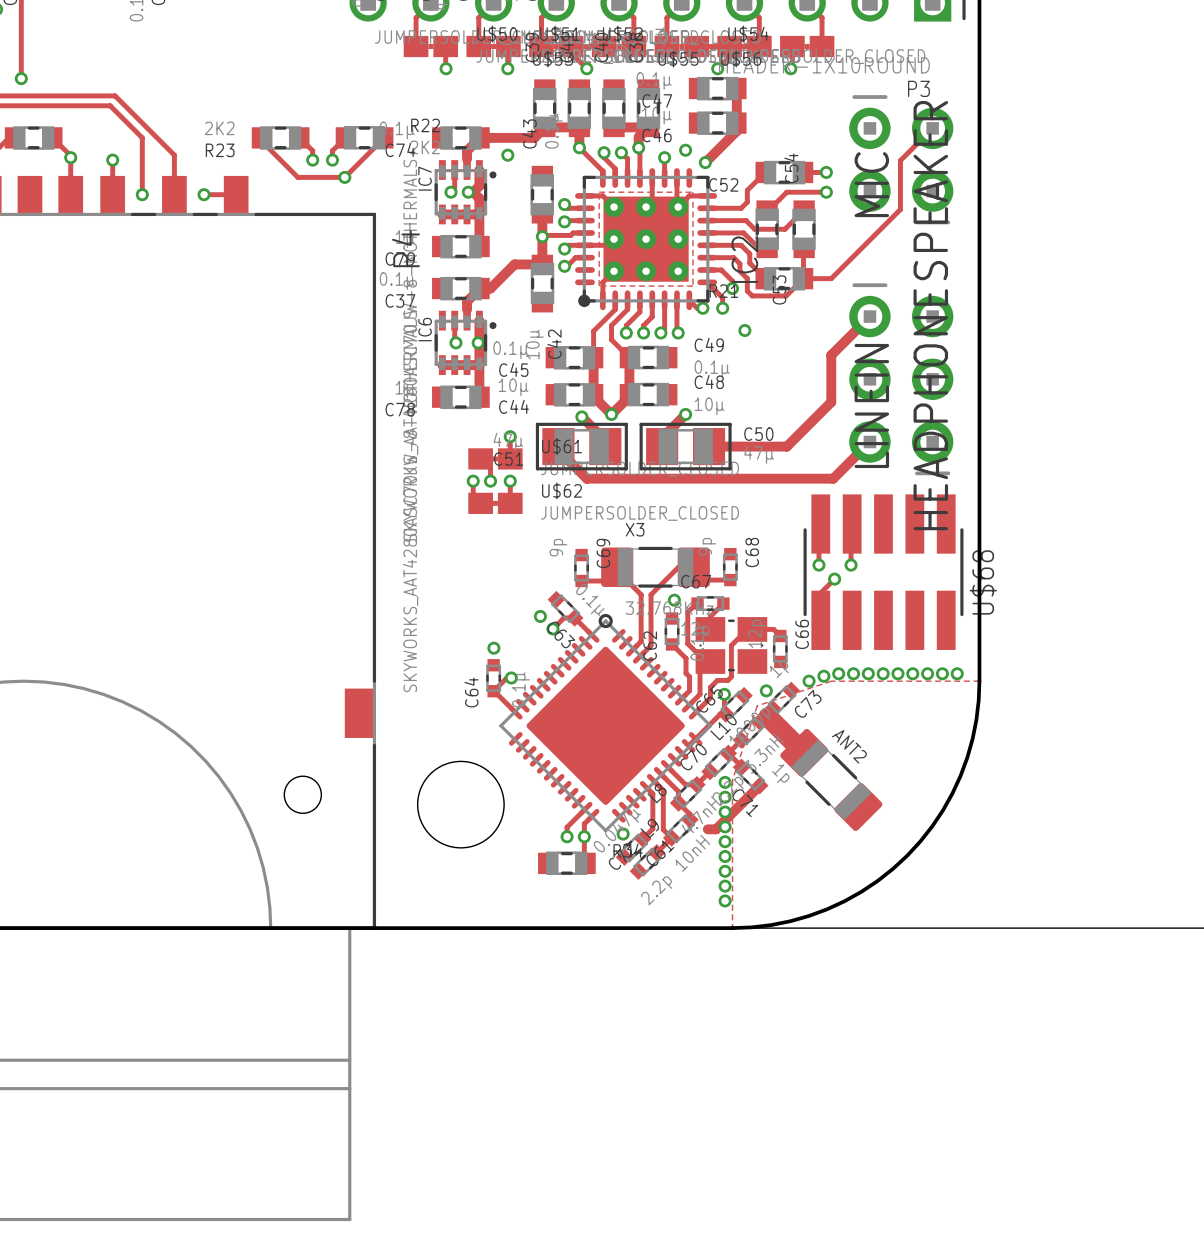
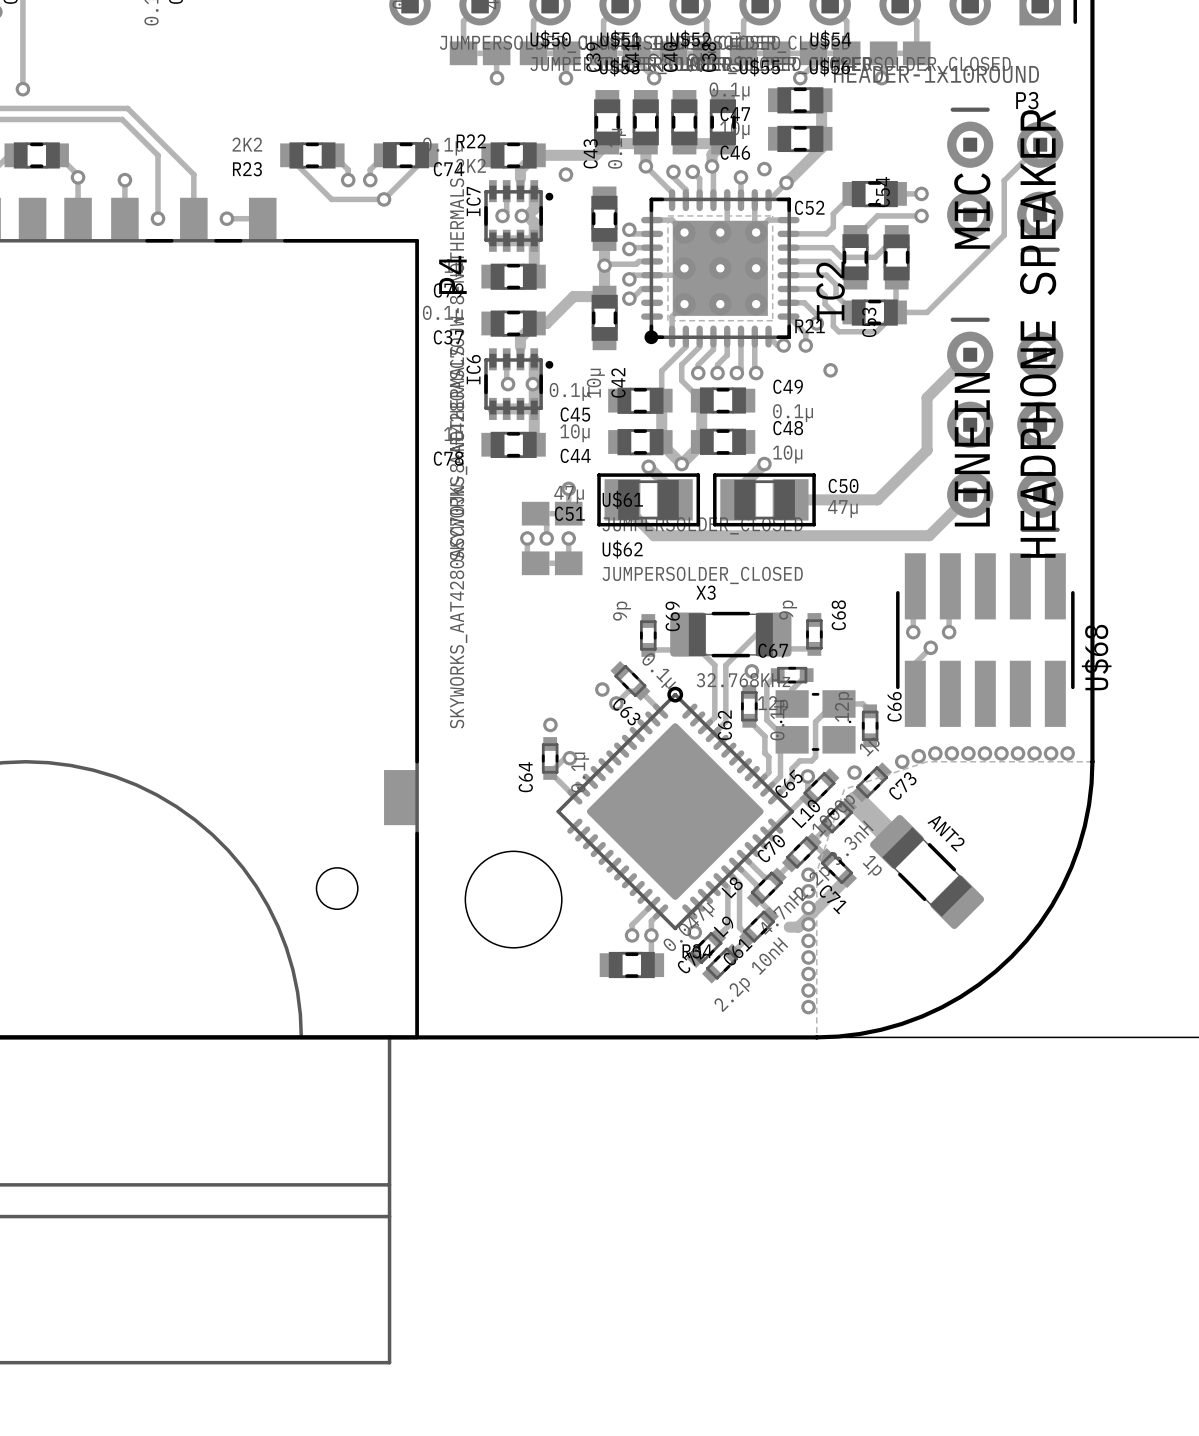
track: none -> (786, 182) (768, 200)

